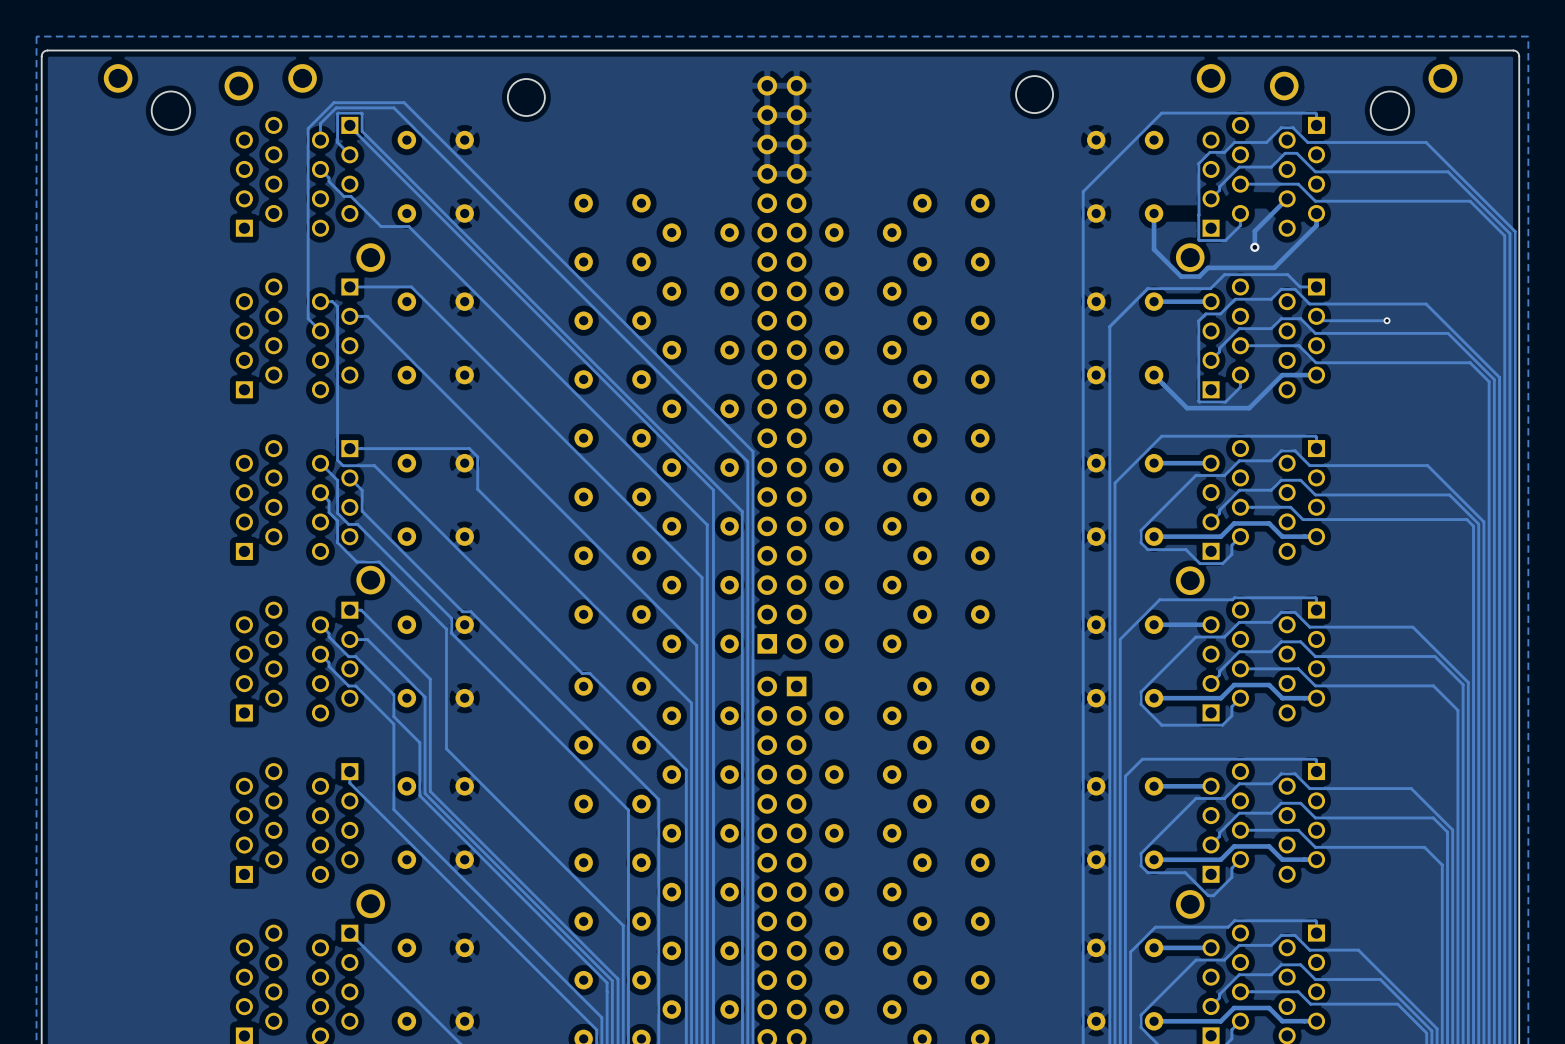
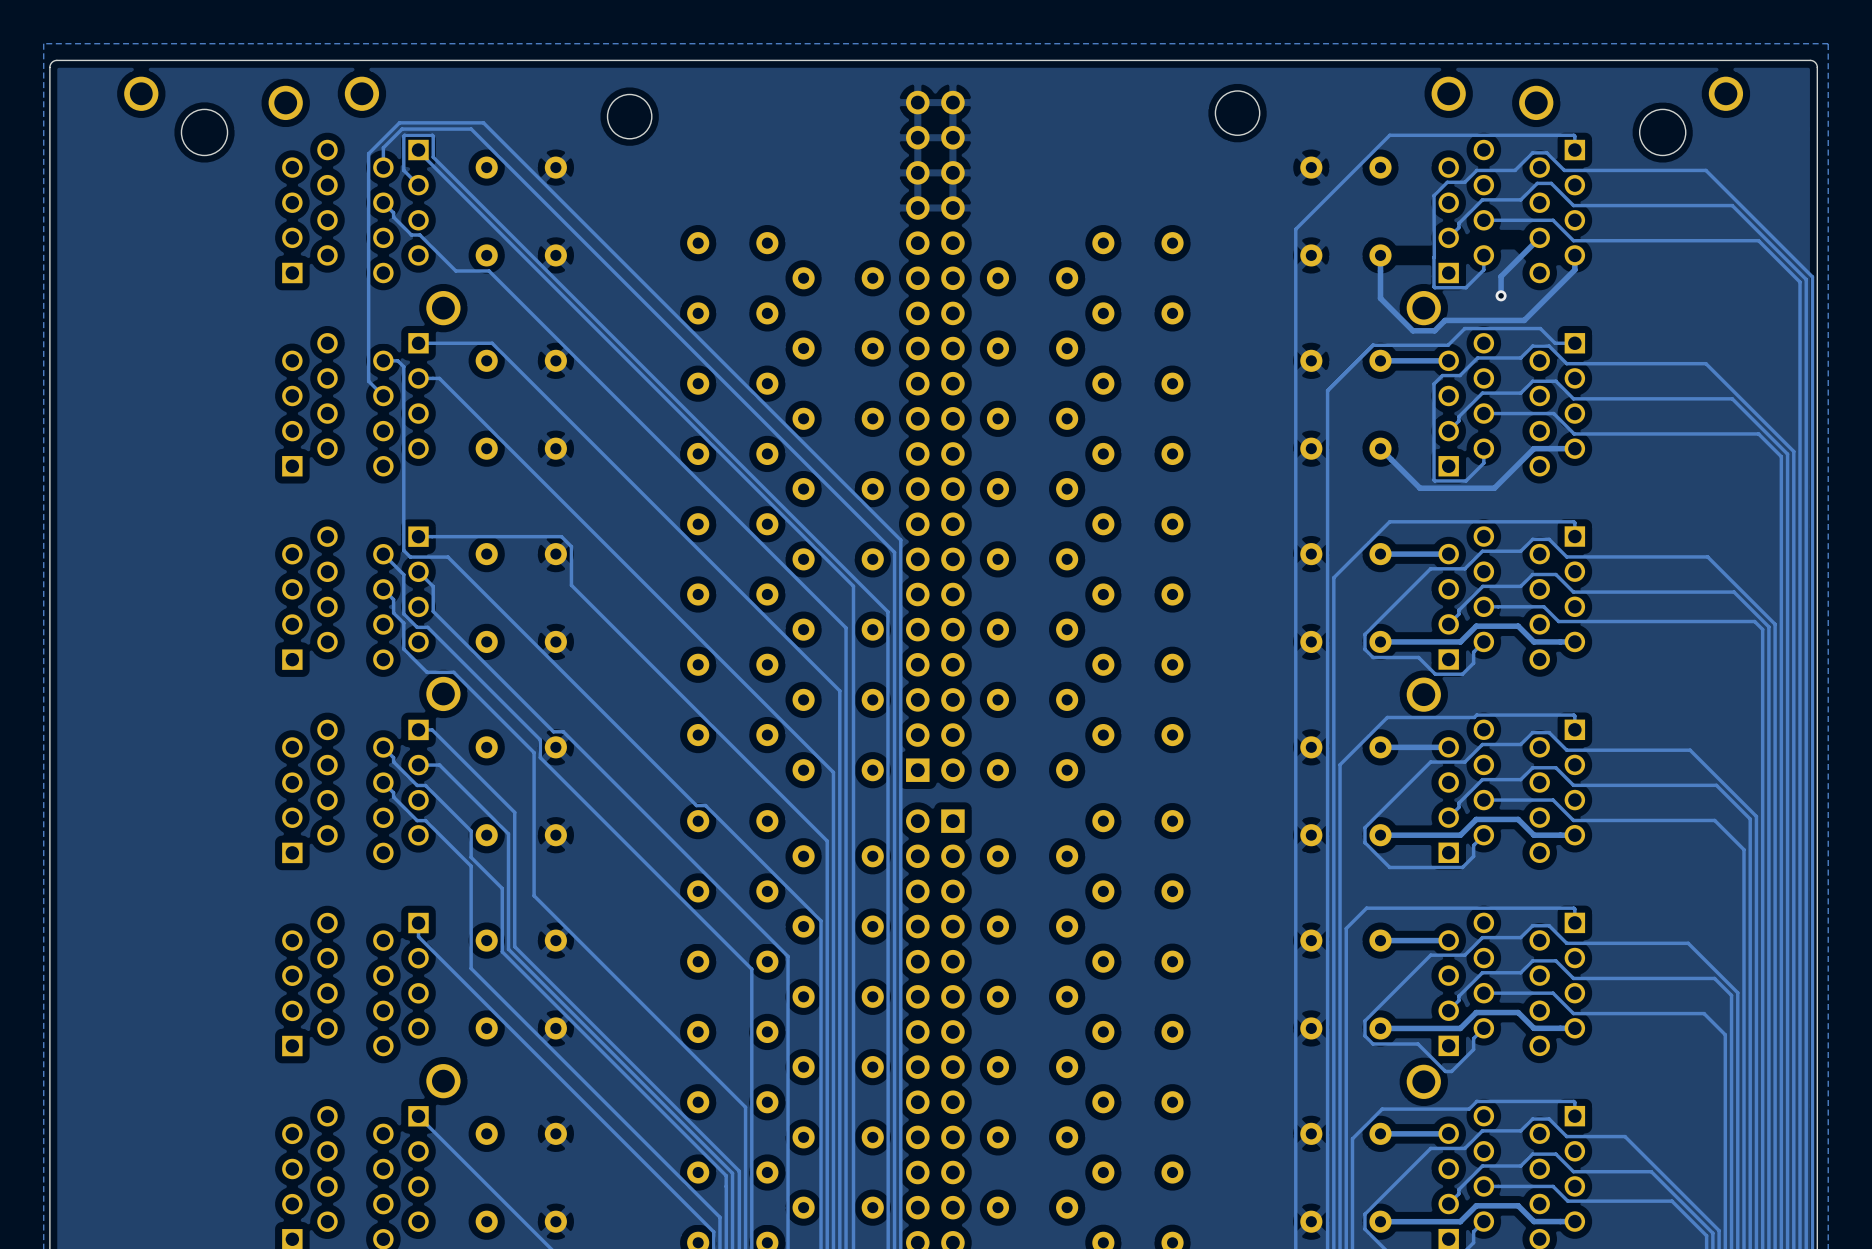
track: (1316, 316) (1320, 320) (1387, 320) -> none
via: (1387, 320) -> none

